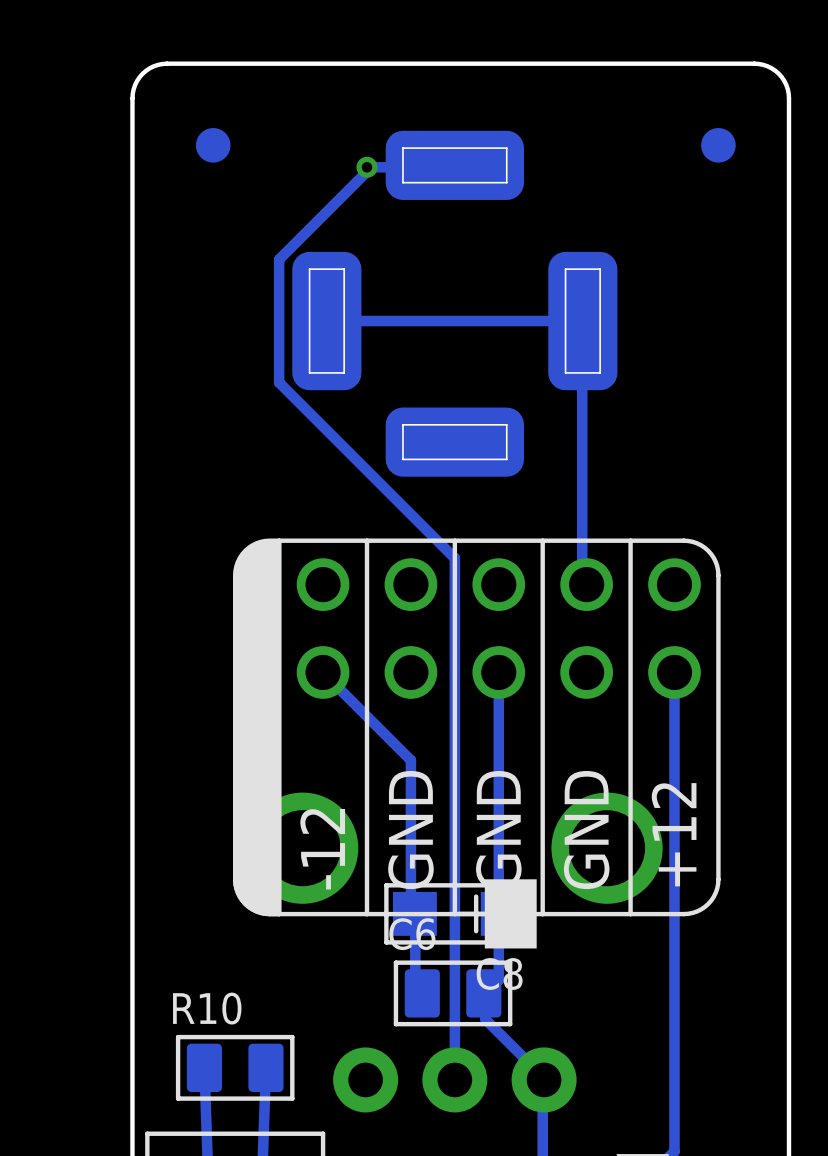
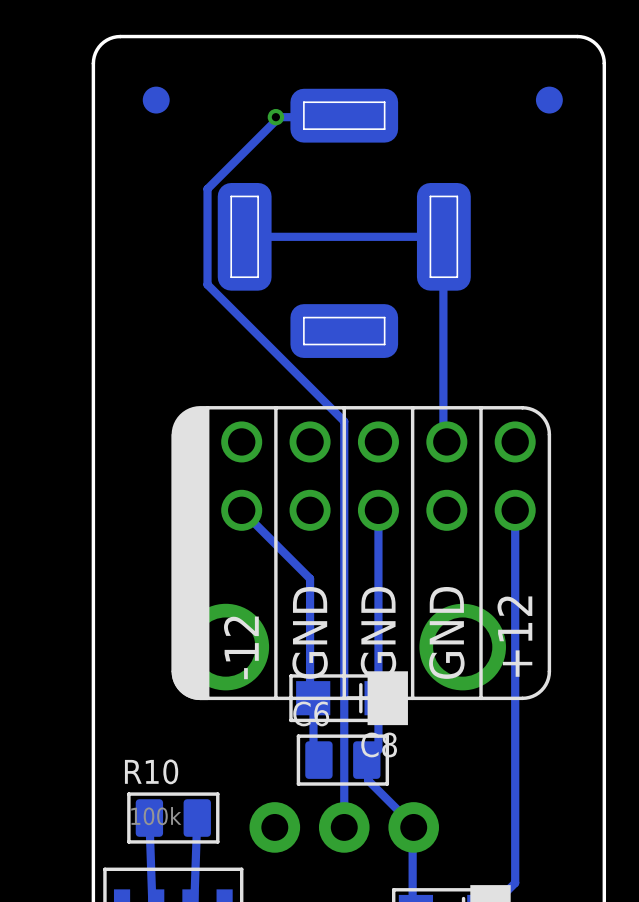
R10 value: none -> 100k (156, 816)

